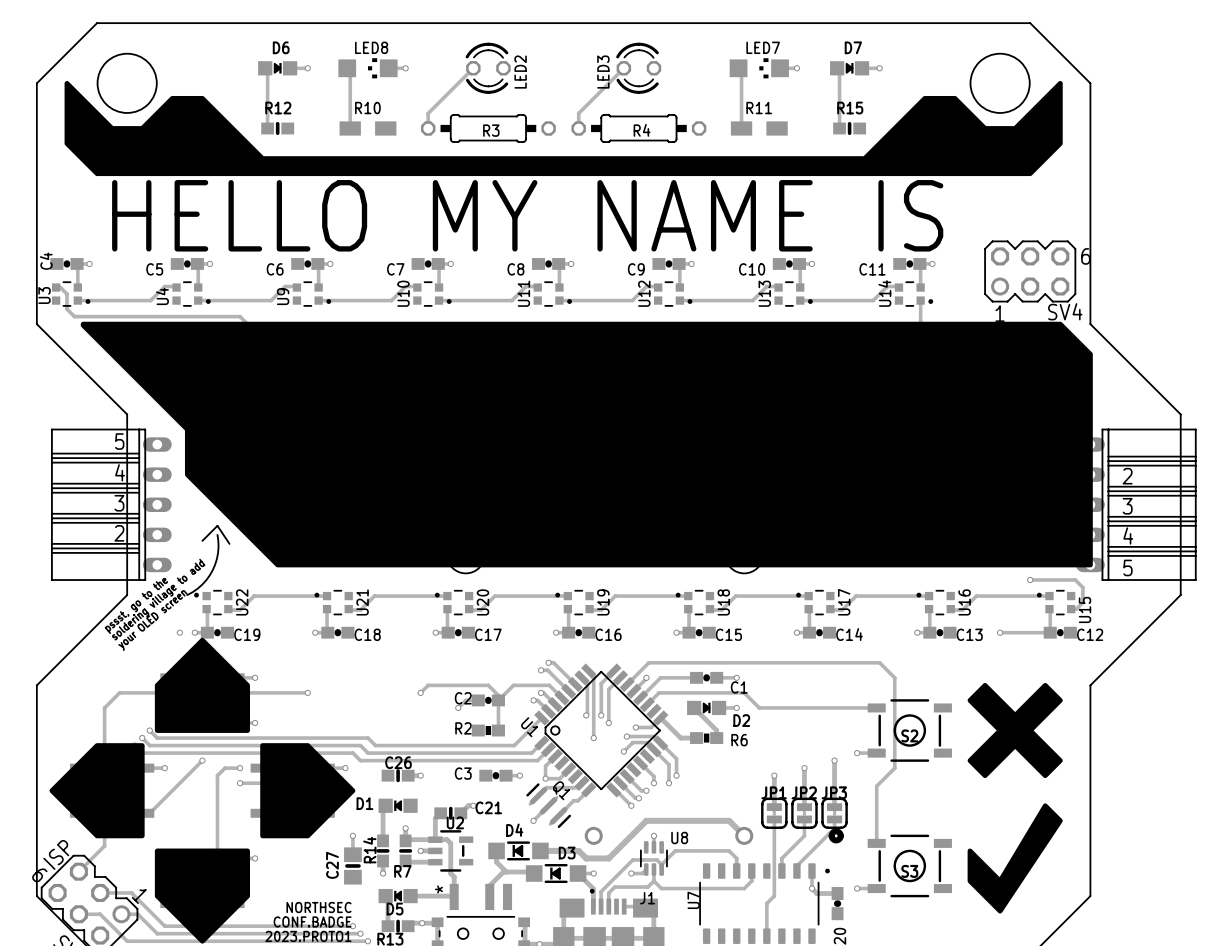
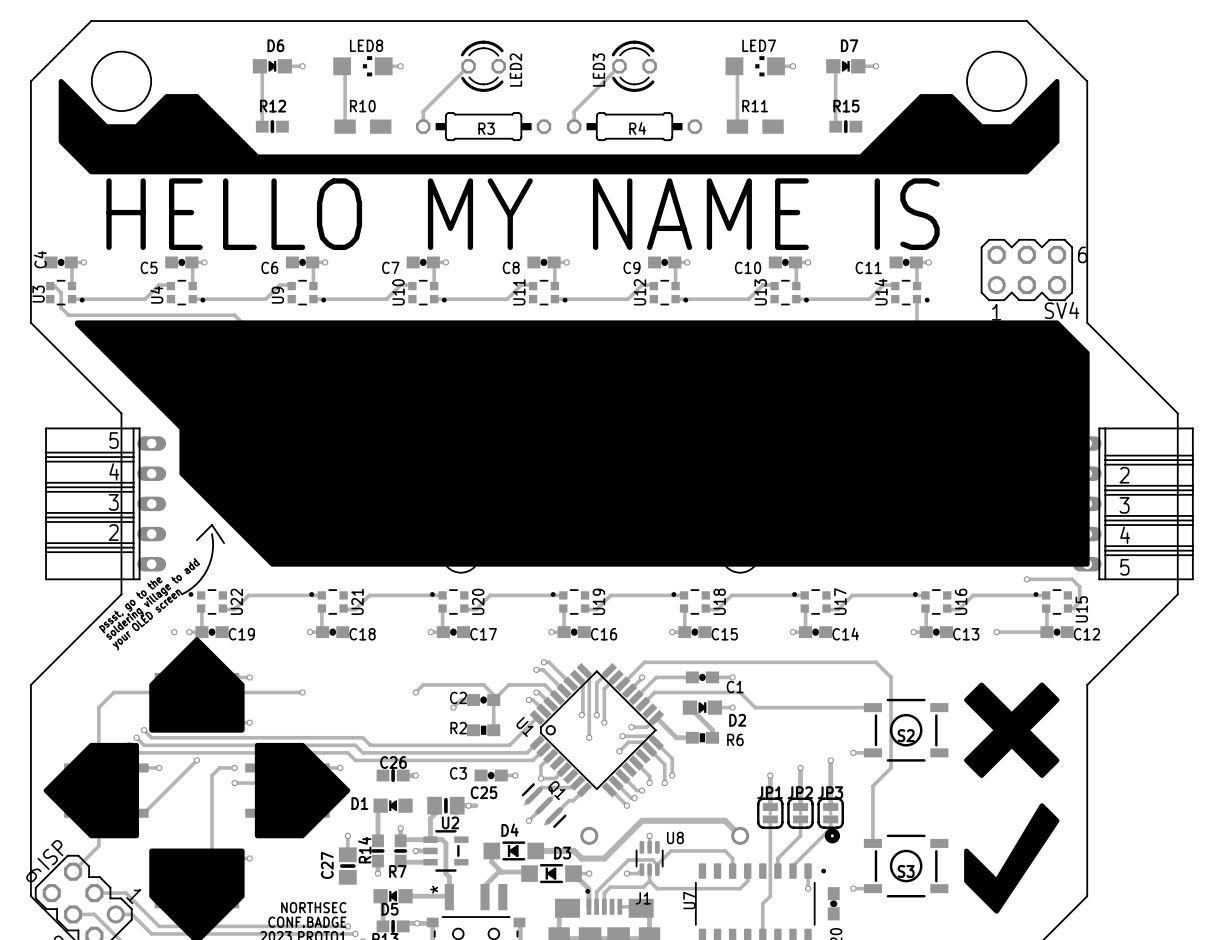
C25: none -> (445, 805)
track: none -> (468, 805) (476, 805)
C21: (450, 813) -> none
track: (811, 888) (816, 893) (837, 893) -> none

